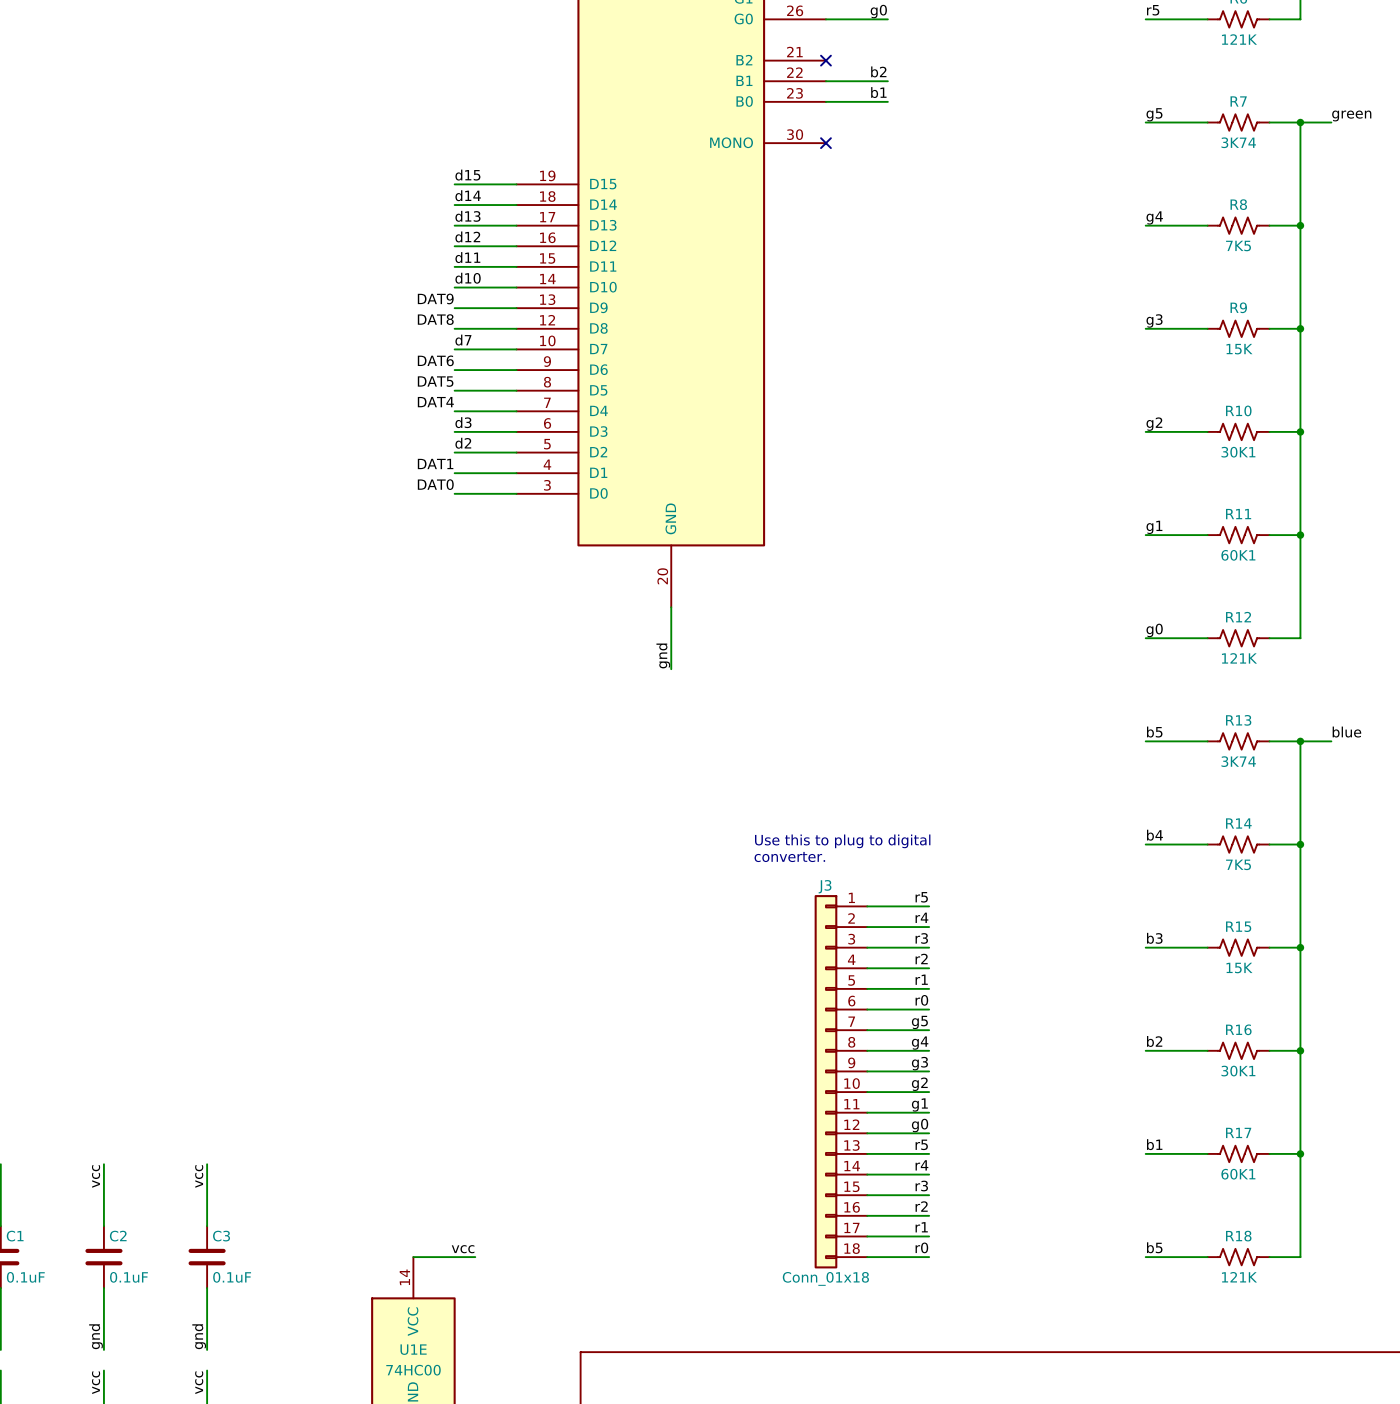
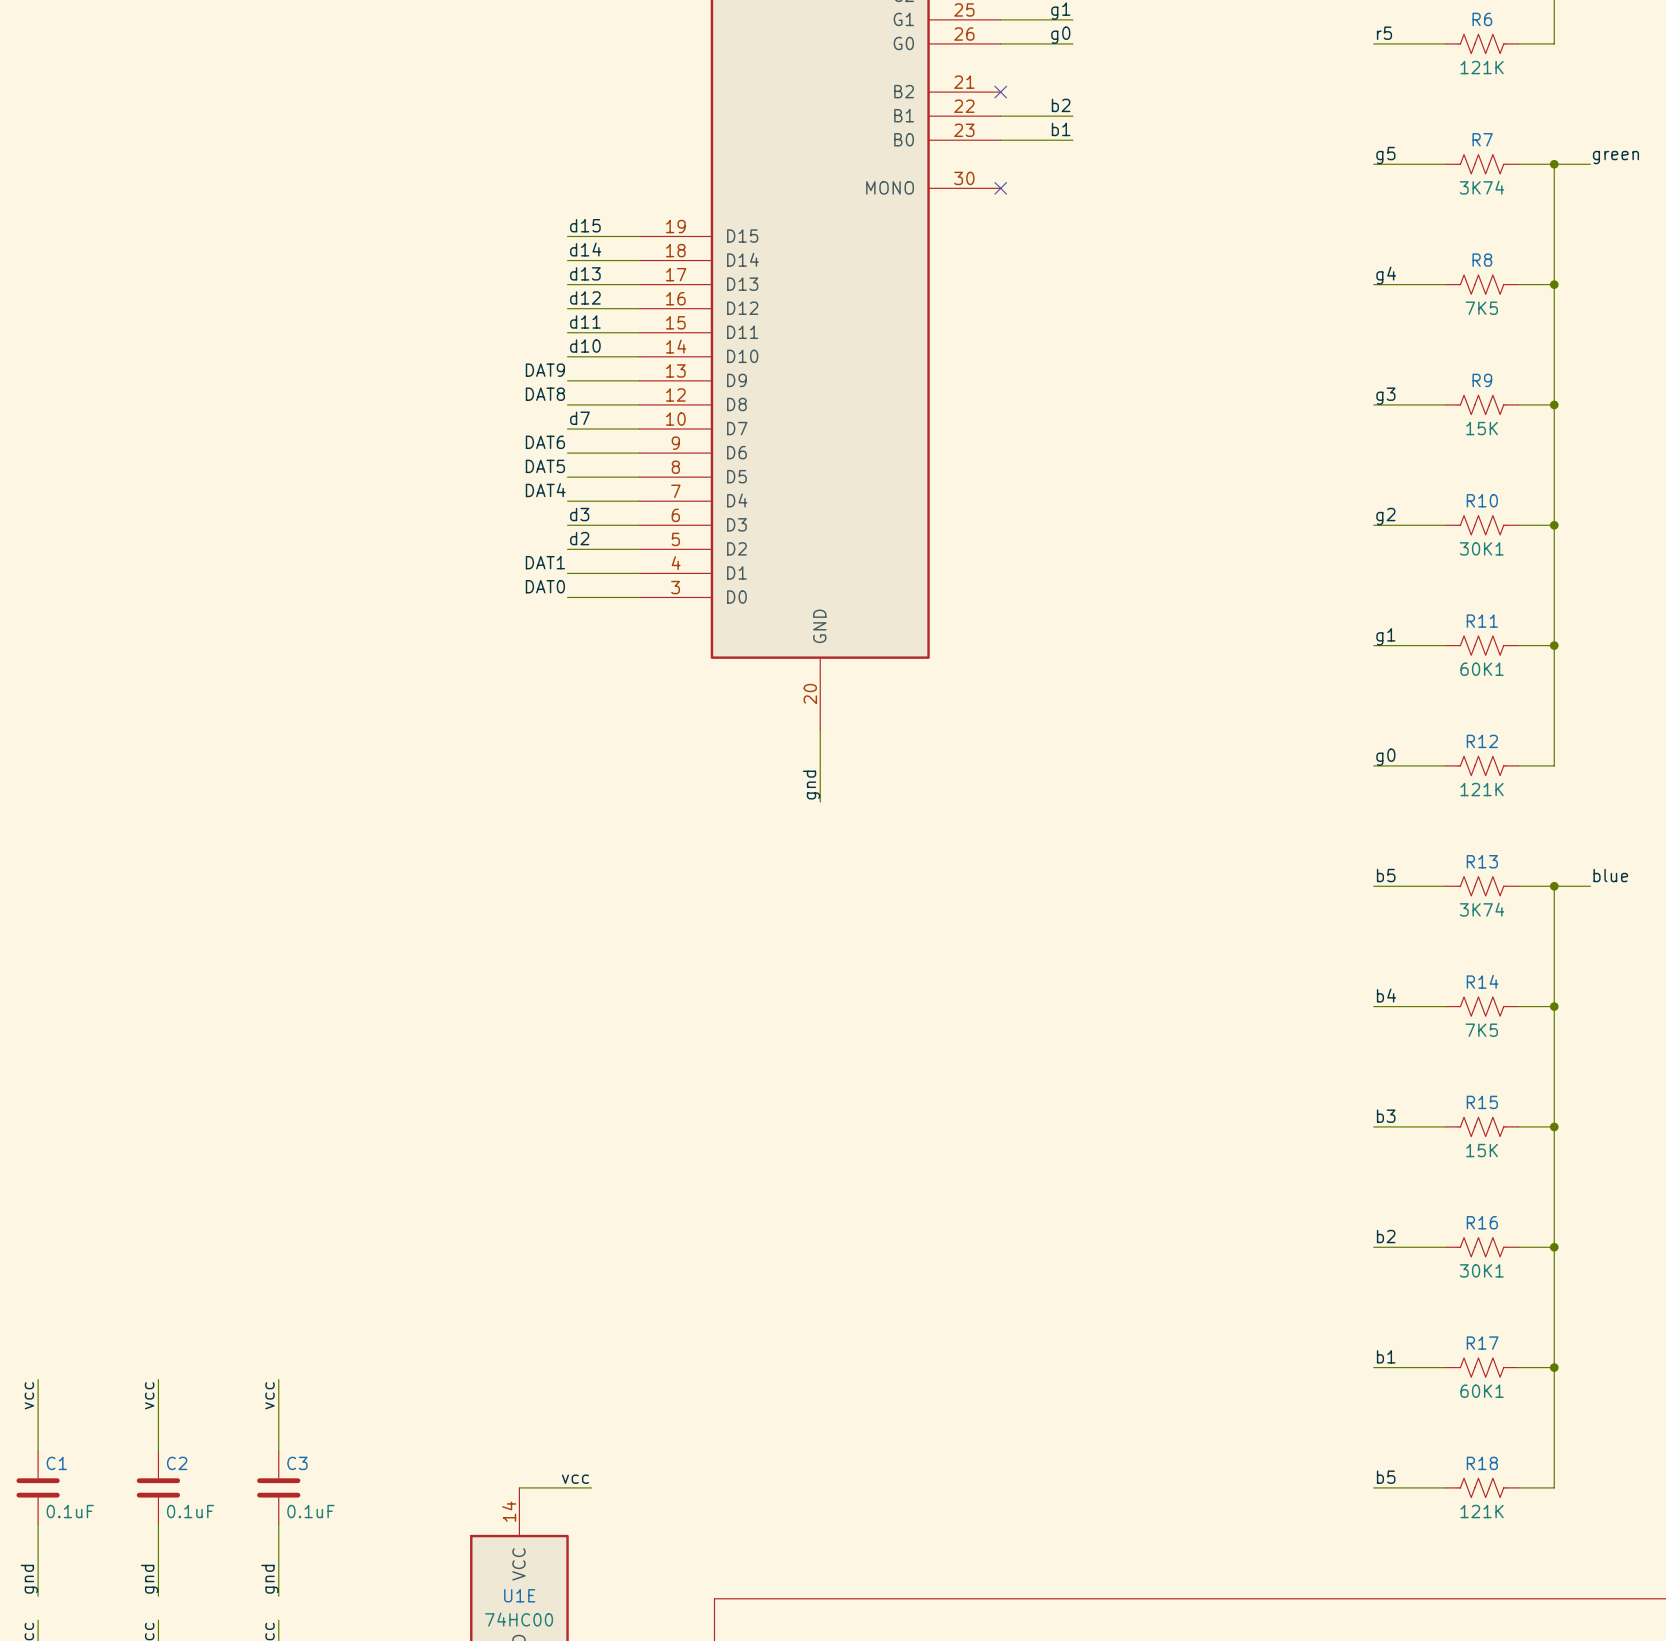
text: Use this to plug to digital (842, 841) -> none
text: converter. (789, 856) -> none
label: r5 (921, 897) -> none
wire: (867, 906) (929, 906) -> none
label: r4 (921, 917) -> none
wire: (867, 927) (929, 927) -> none
label: r3 (921, 938) -> none
wire: (867, 947) (929, 947) -> none
label: r2 (921, 958) -> none
wire: (867, 968) (929, 968) -> none
label: r1 (921, 979) -> none
wire: (867, 988) (929, 988) -> none
label: r0 (921, 1000) -> none
wire: (867, 1009) (929, 1009) -> none
label: g5 (919, 1022) -> none
wire: (867, 1030) (929, 1030) -> none
label: g4 (920, 1043) -> none
wire: (867, 1050) (929, 1050) -> none
label: g3 (919, 1063) -> none
wire: (867, 1071) (929, 1071) -> none
J3: Conn_01x18 (840, 1081) -> none
label: g2 (919, 1084) -> none
wire: (867, 1092) (929, 1092) -> none
label: g1 (919, 1104) -> none
wire: (867, 1112) (929, 1112) -> none
label: g0 (920, 1125) -> none
wire: (867, 1133) (929, 1133) -> none
label: r5 (921, 1144) -> none
wire: (867, 1153) (929, 1153) -> none
label: r4 (921, 1165) -> none
wire: (867, 1174) (929, 1174) -> none
label: r3 (921, 1186) -> none
wire: (867, 1195) (929, 1195) -> none
label: r2 (921, 1206) -> none
wire: (867, 1215) (929, 1215) -> none
label: r1 (921, 1227) -> none
wire: (867, 1236) (929, 1236) -> none
label: r0 (921, 1247) -> none
wire: (867, 1257) (929, 1257) -> none

